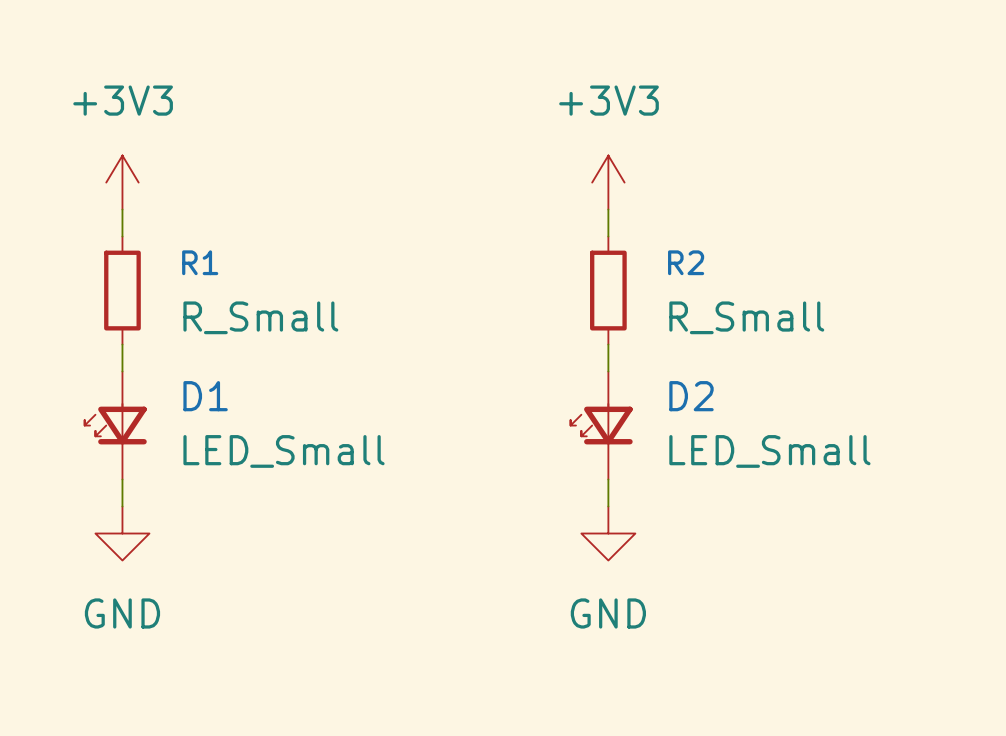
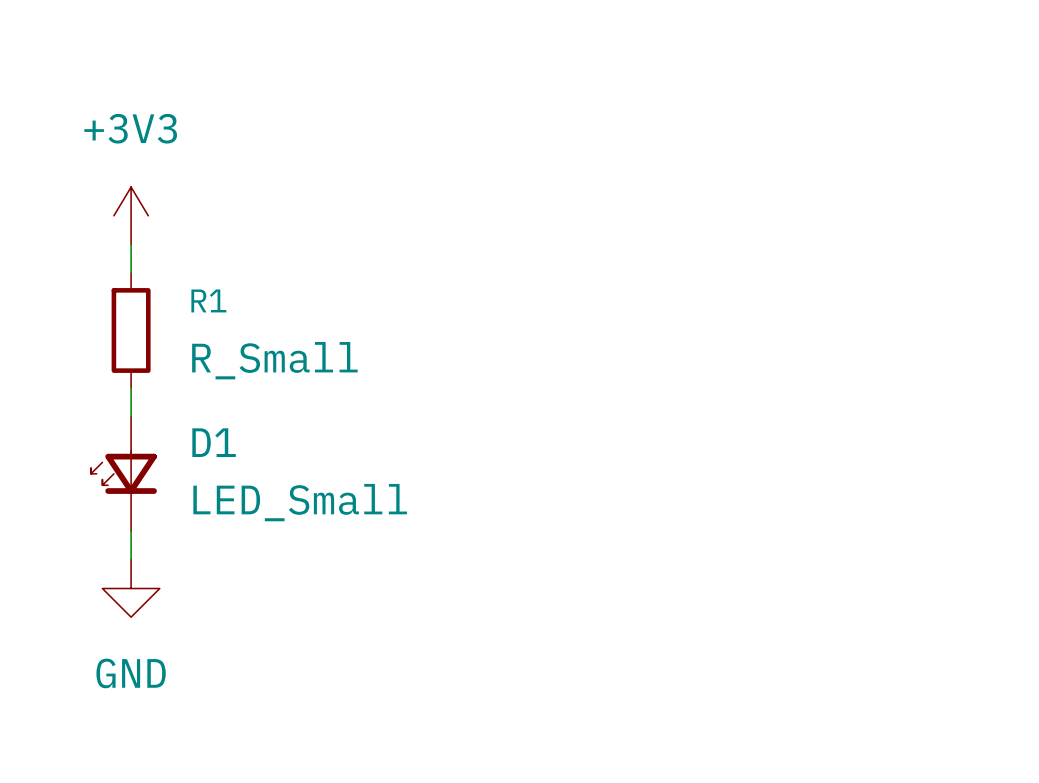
power symbol: +3V3 (608, 182) -> none
wire: (608, 209) (608, 236) -> none
R2: R_Small (608, 290) -> none
wire: (608, 344) (608, 371) -> none
D2: LED_Small (601, 425) -> none
wire: (608, 479) (608, 506) -> none
power symbol: GND (608, 533) -> none

